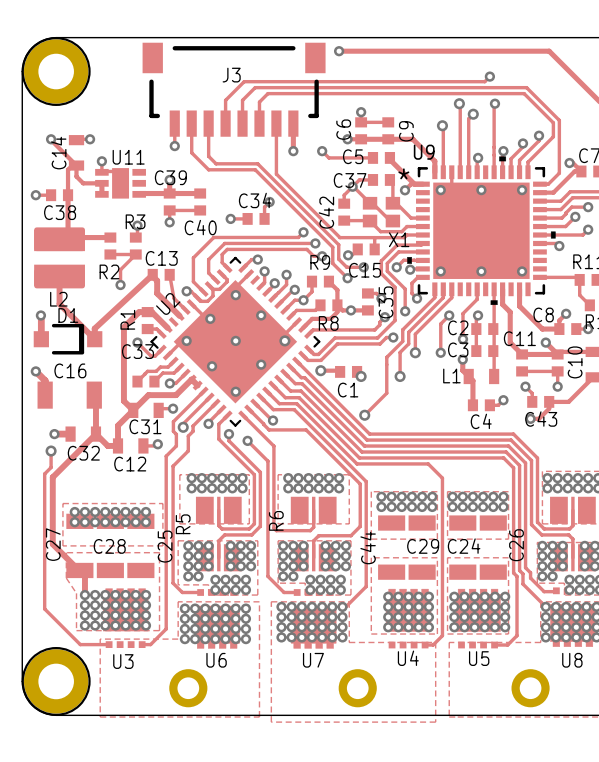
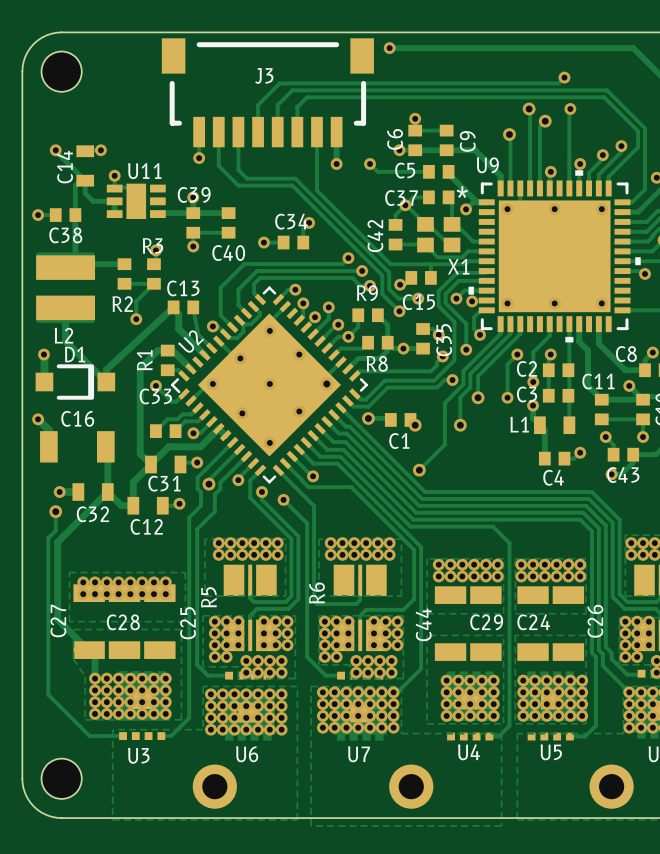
part: (56, 71) -> none
hole: none -> (61, 71)
part: (56, 681) -> none
hole: none -> (61, 778)

